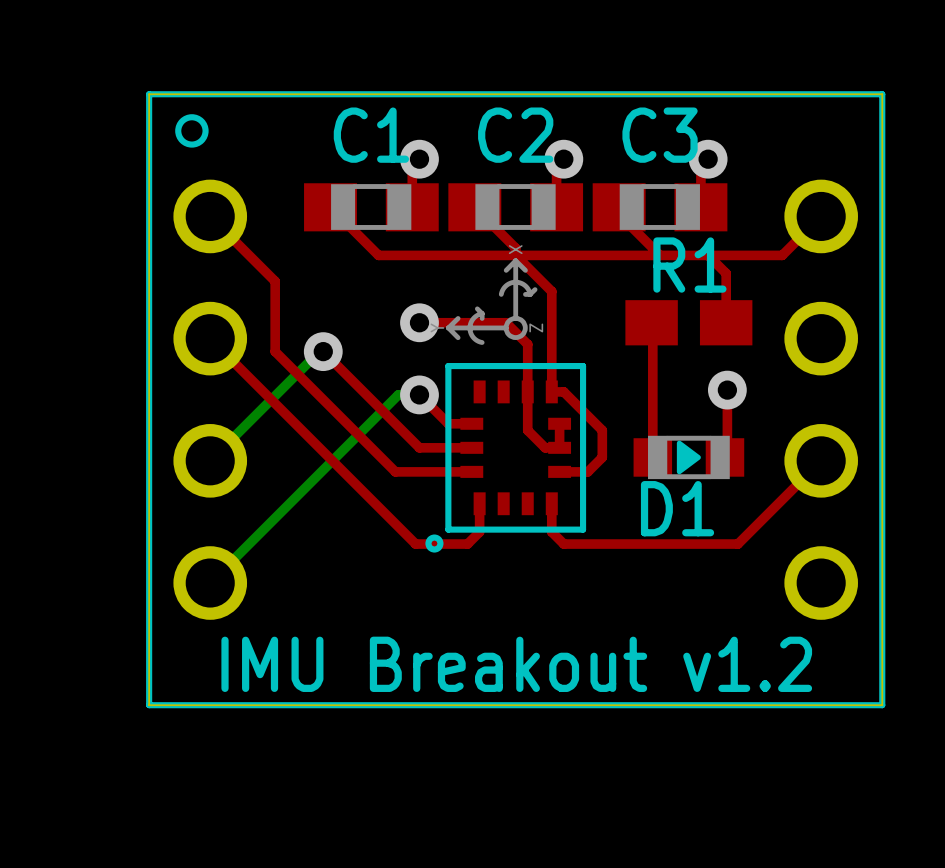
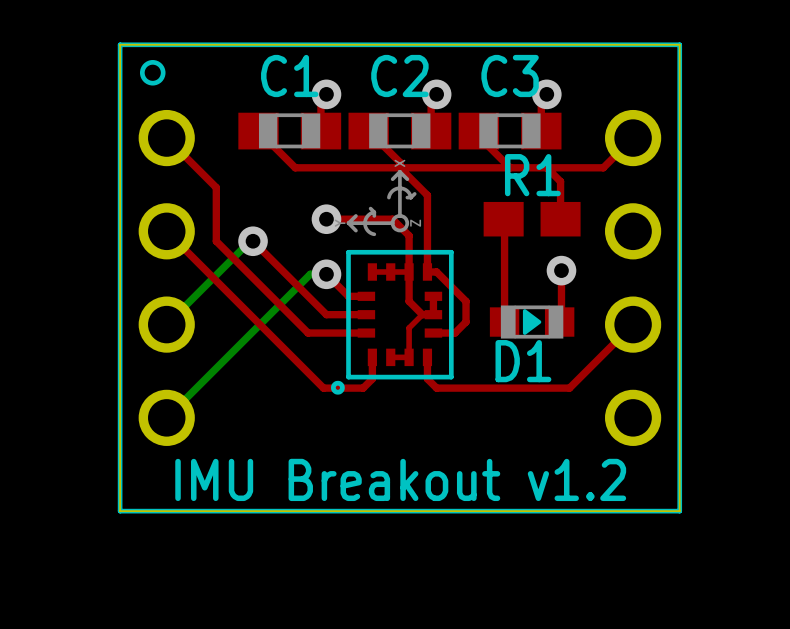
top track: none -> (372, 271) (409, 271)
top track: none -> (422, 314) (409, 327) (409, 357) (390, 357)

